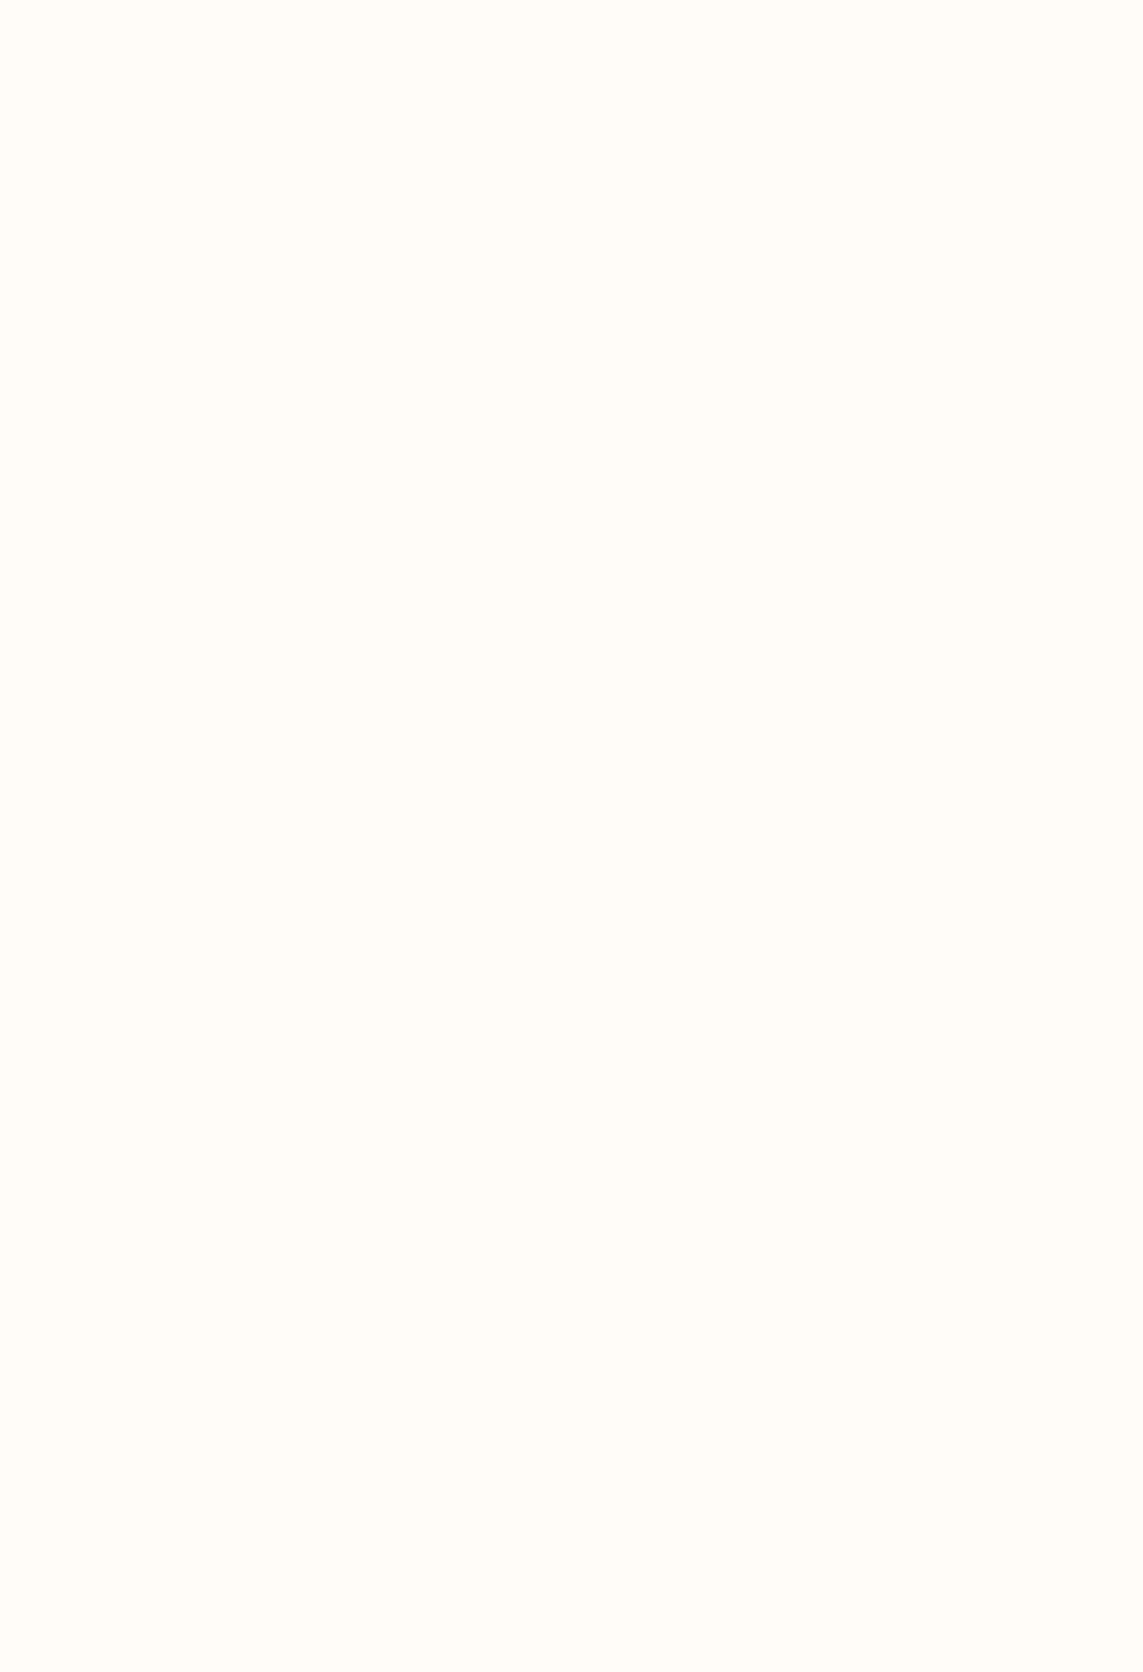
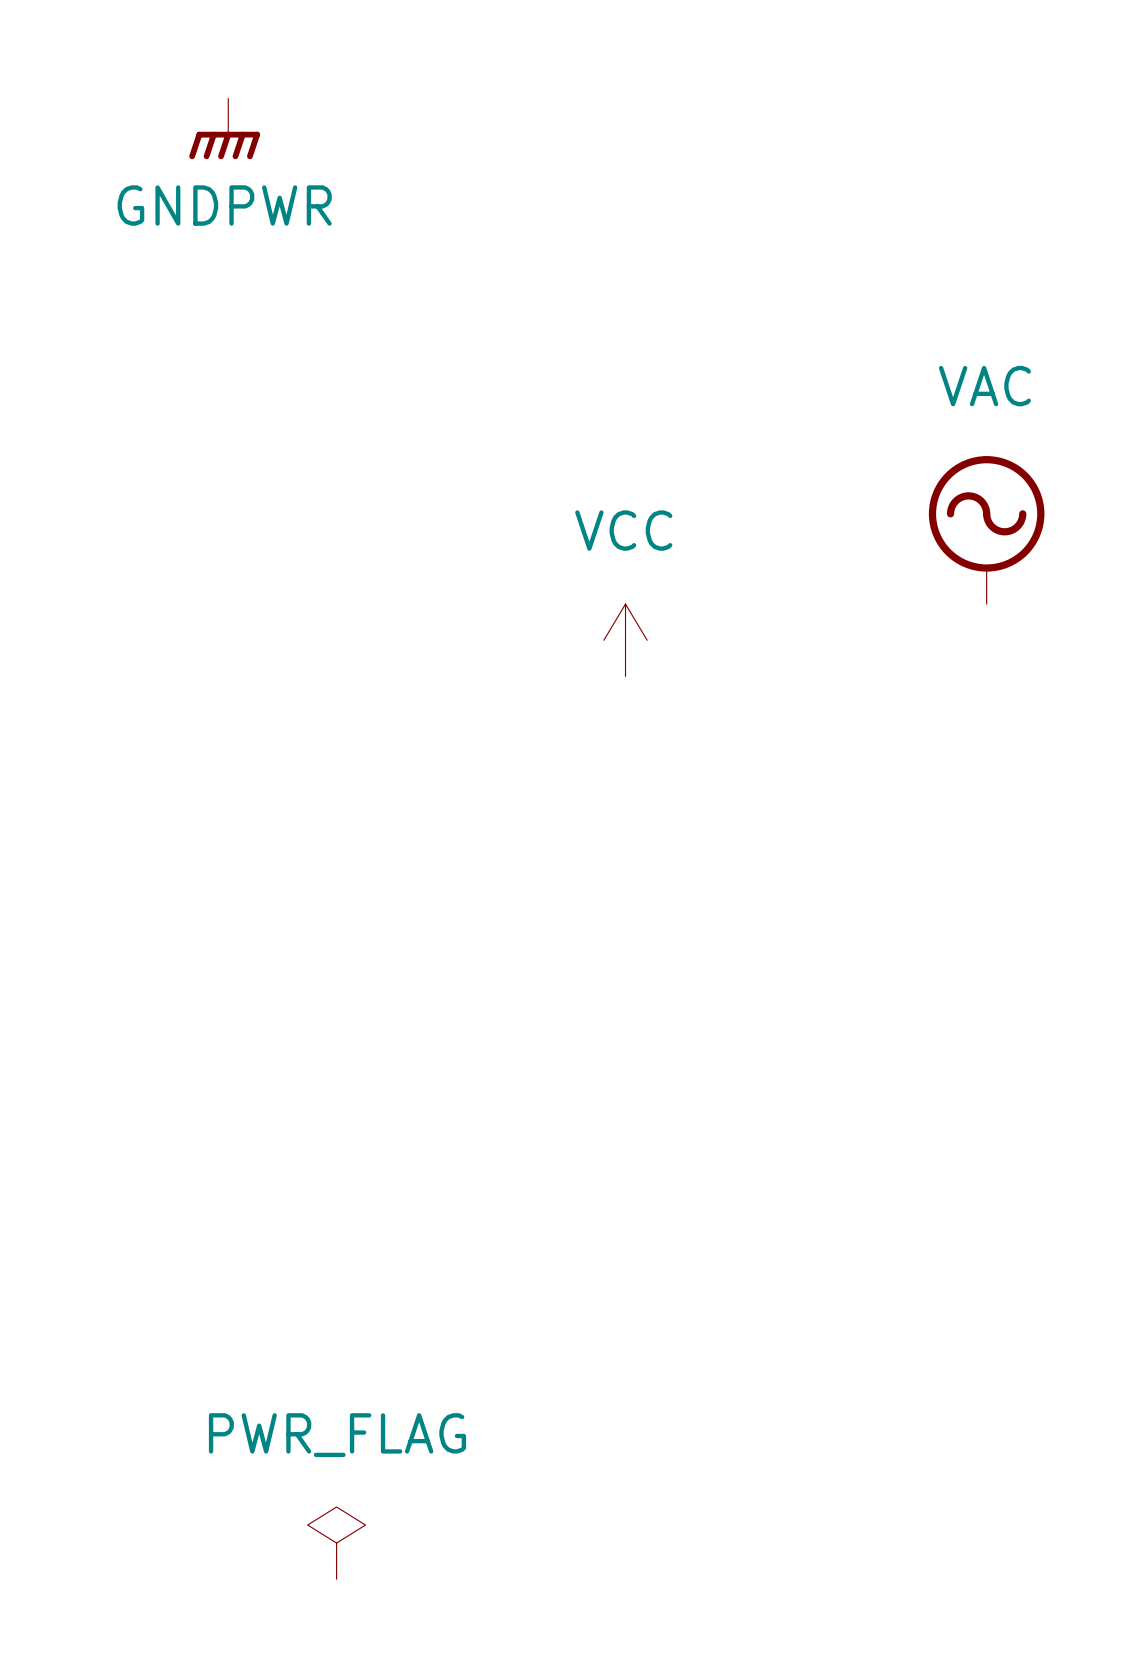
power symbol: none -> GNDPWR (224, 128)
power symbol: none -> VAC (986, 530)
power symbol: none -> VCC (625, 640)
power symbol: none -> PWR_FLAG (336, 1543)

